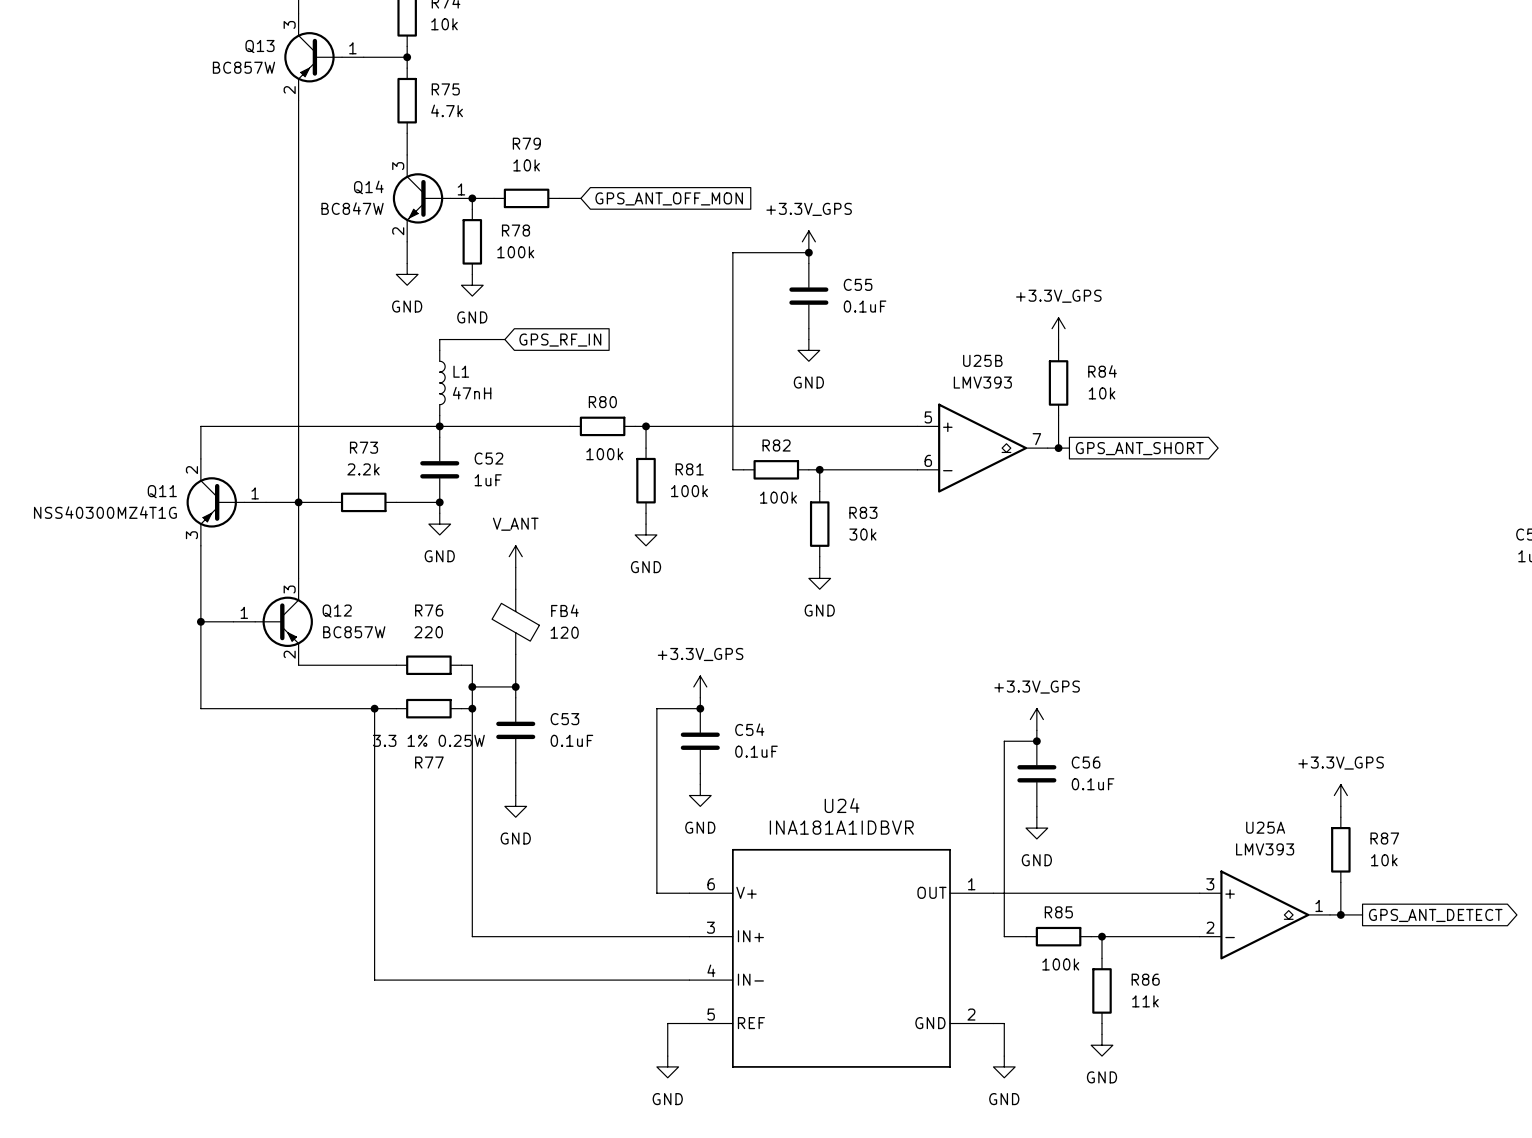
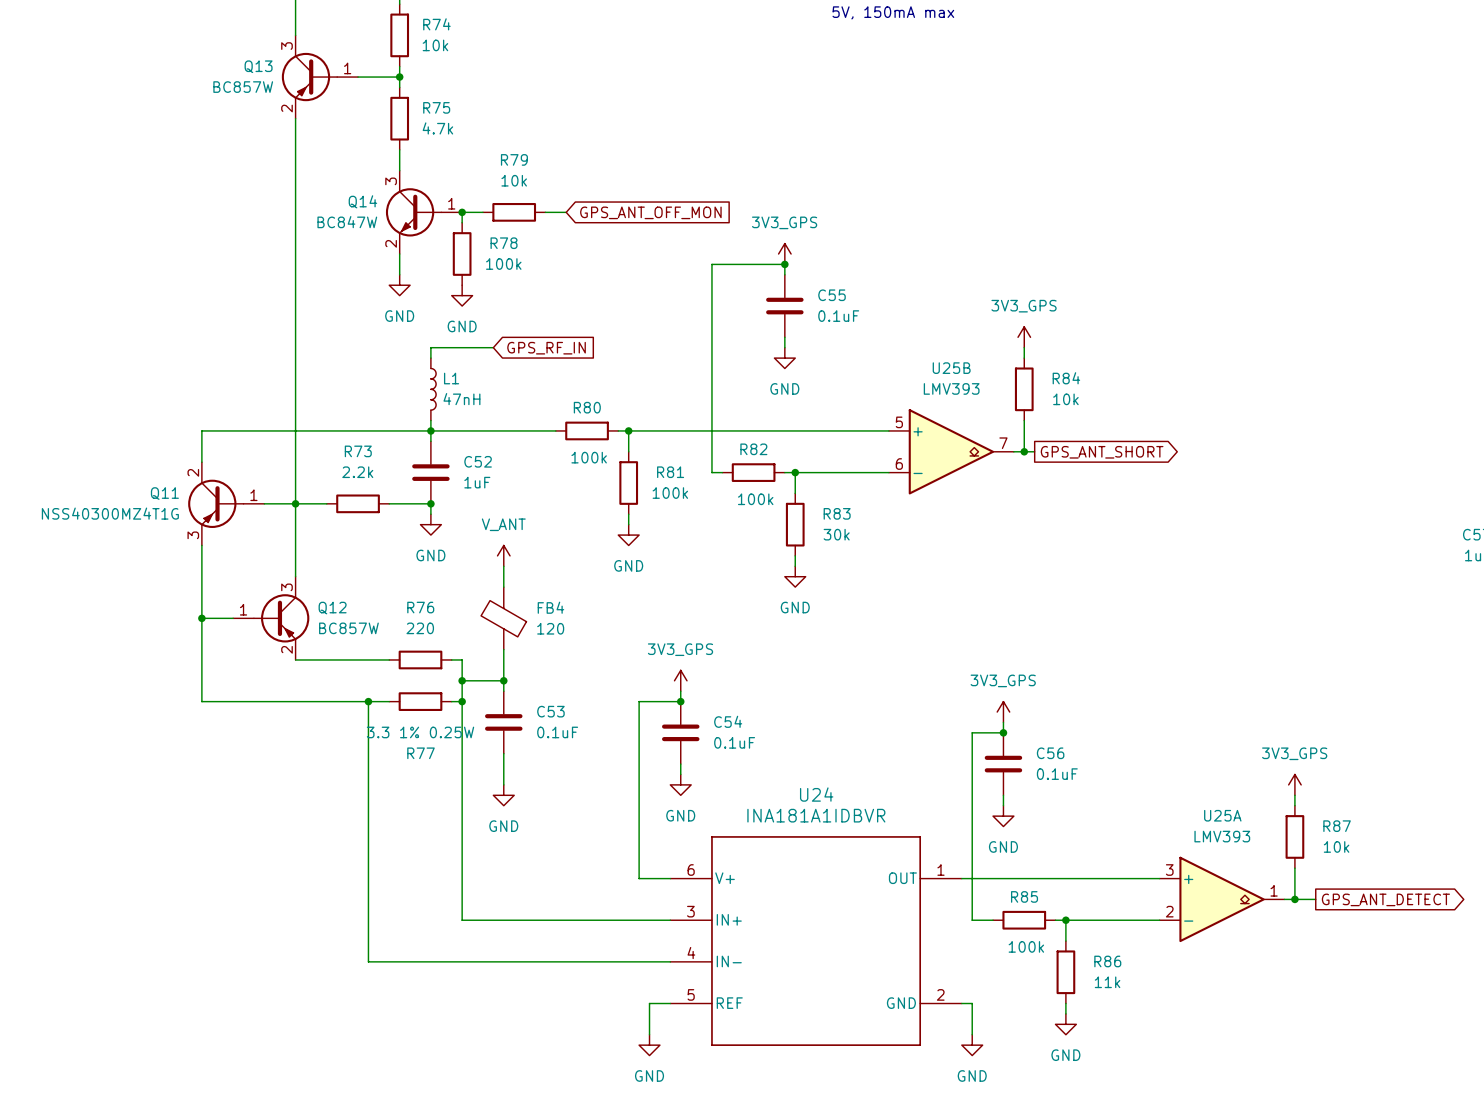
power symbol: +3.3V_GPS (808, 241) -> 3V3_GPS (784, 254)
power symbol: +3.3V_GPS (1058, 328) -> 3V3_GPS (1024, 337)
power symbol: +3.3V_GPS (700, 686) -> 3V3_GPS (680, 680)
power symbol: +3.3V_GPS (1036, 719) -> 3V3_GPS (1003, 712)
power symbol: +3.3V_GPS (1340, 795) -> 3V3_GPS (1294, 784)

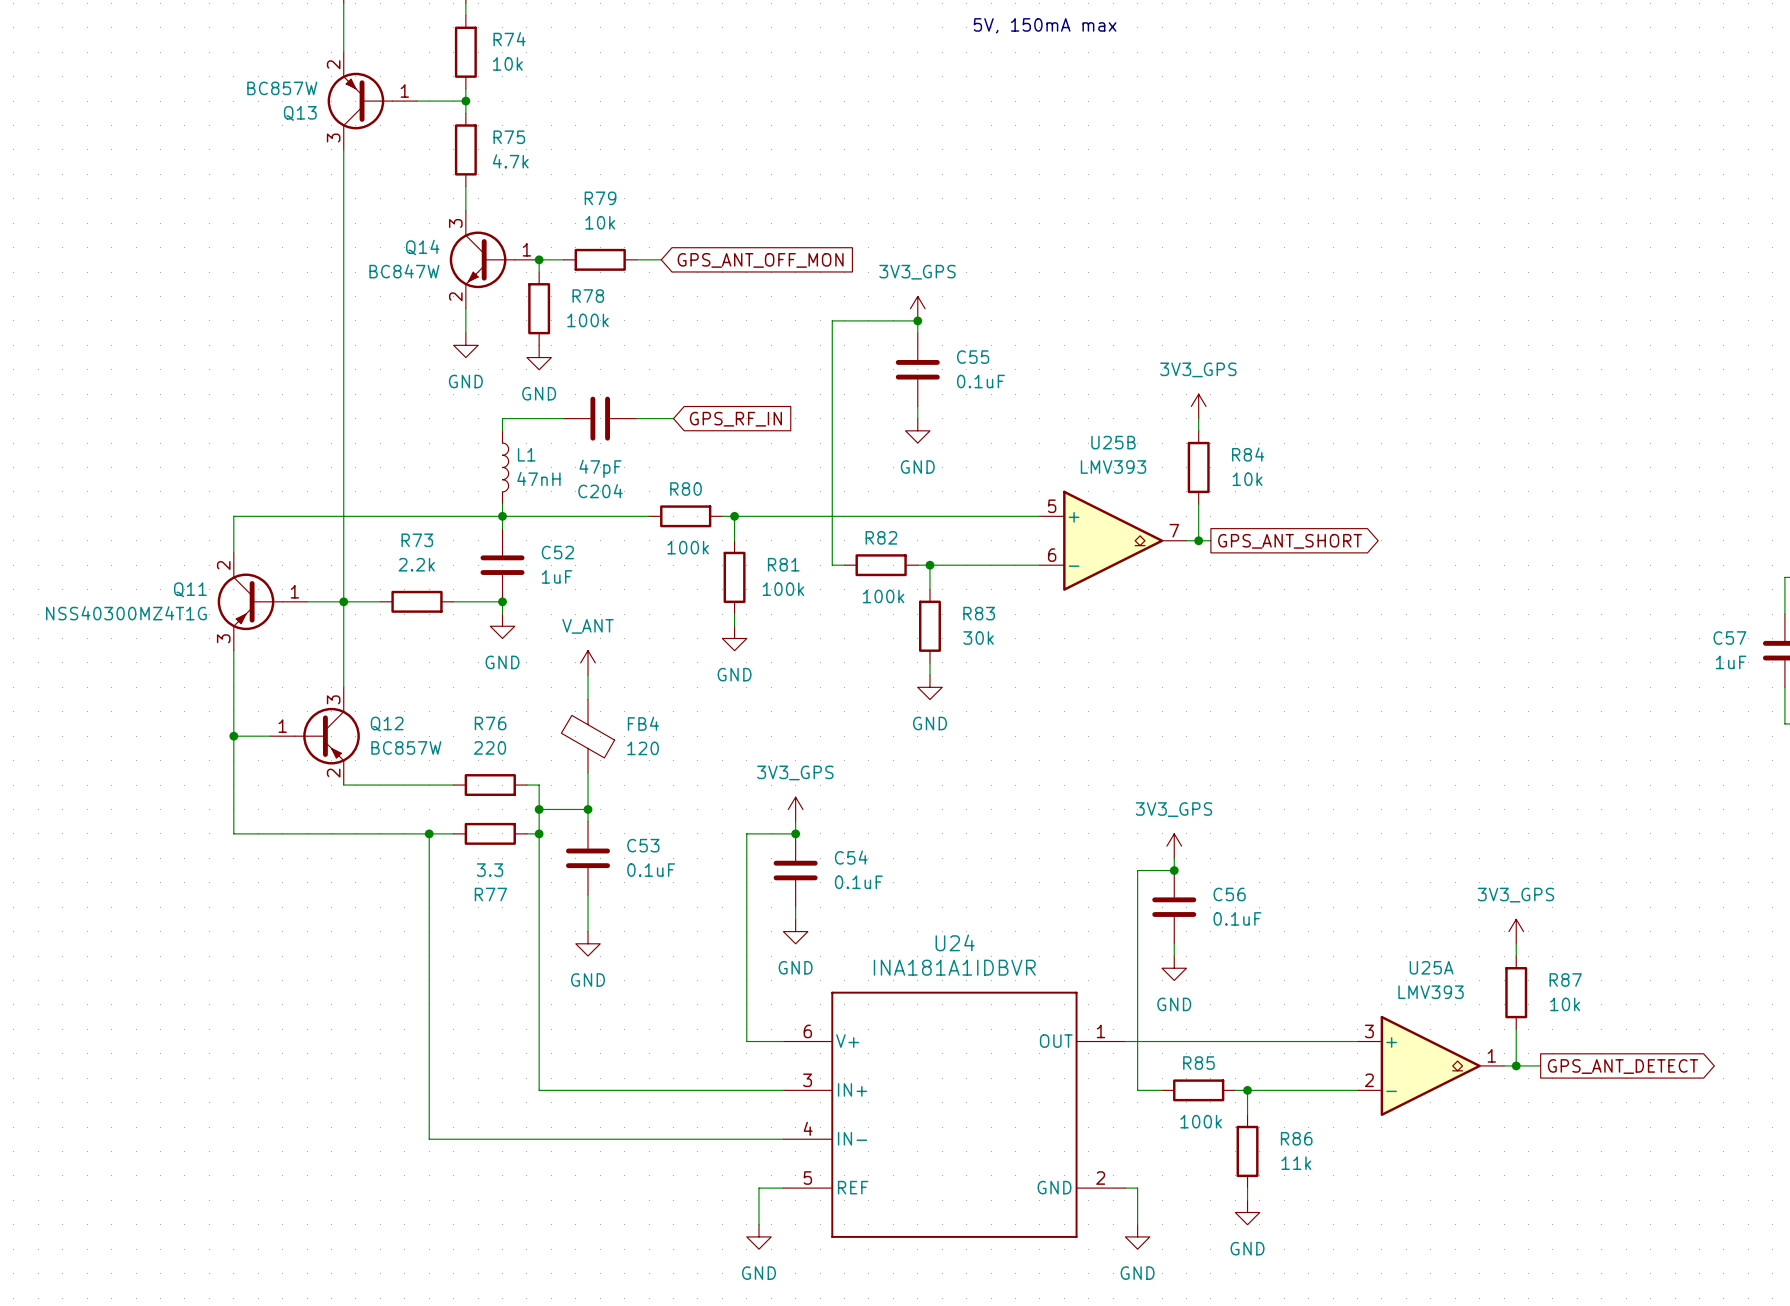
Q13 flip: as is (309, 77) -> up-down (360, 101)
C204: none -> 47pF (600, 418)
wire: none -> (636, 418) (673, 418)
global label position: GPS_RF_IN (546, 348) -> GPS_RF_IN (735, 419)
R77 value: 3.3 1% 0.25W (420, 732) -> 3.3 (490, 870)

